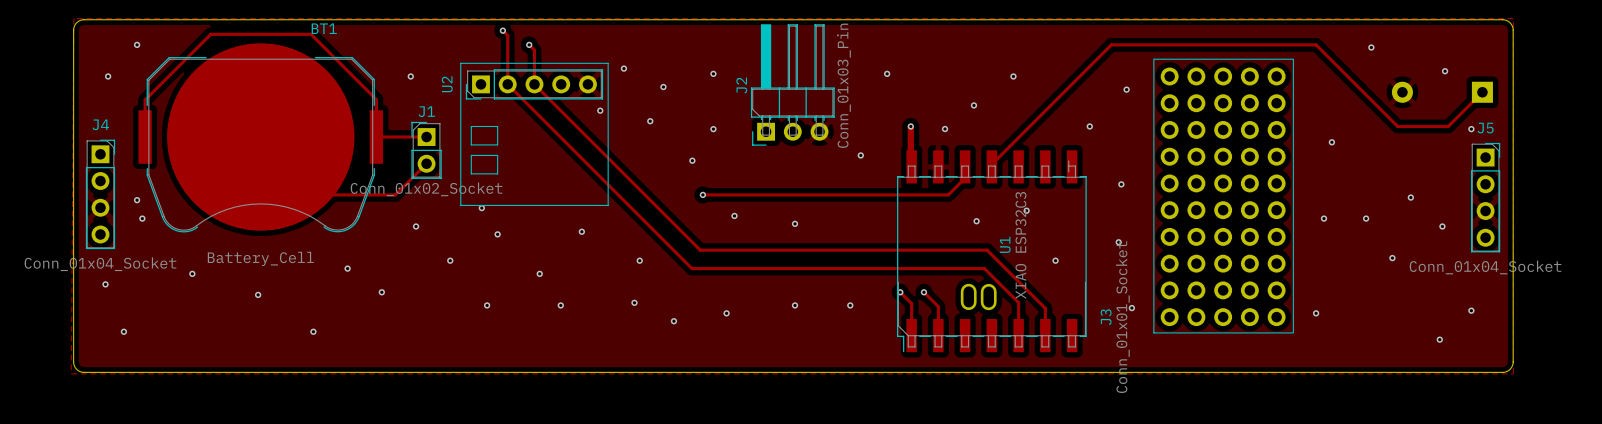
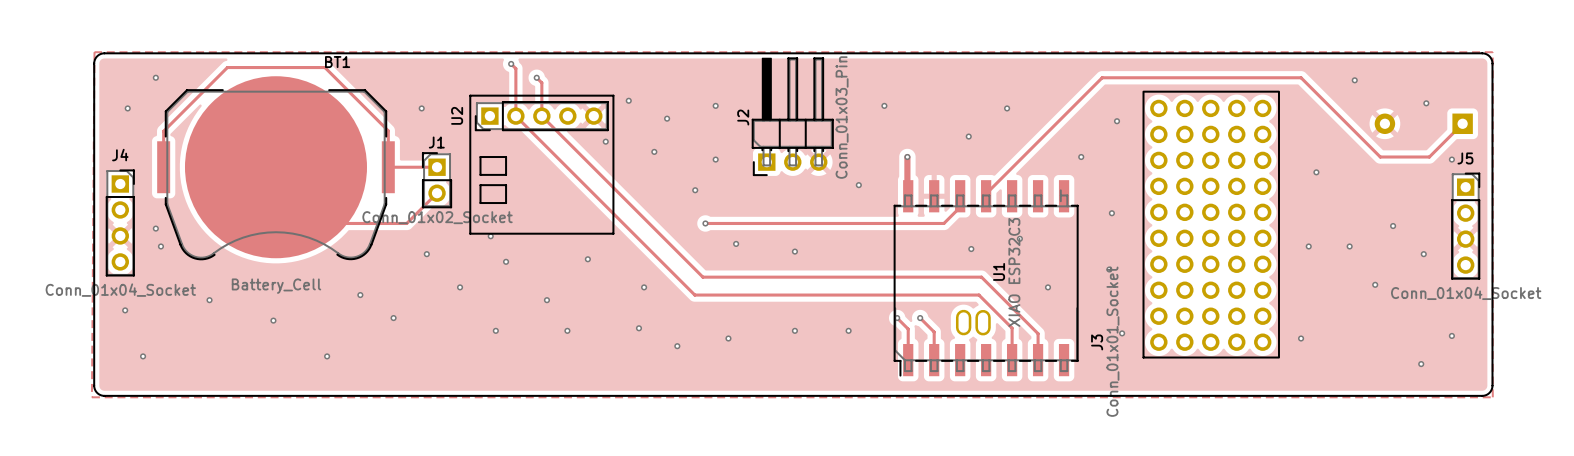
via: (945, 129) -> none

